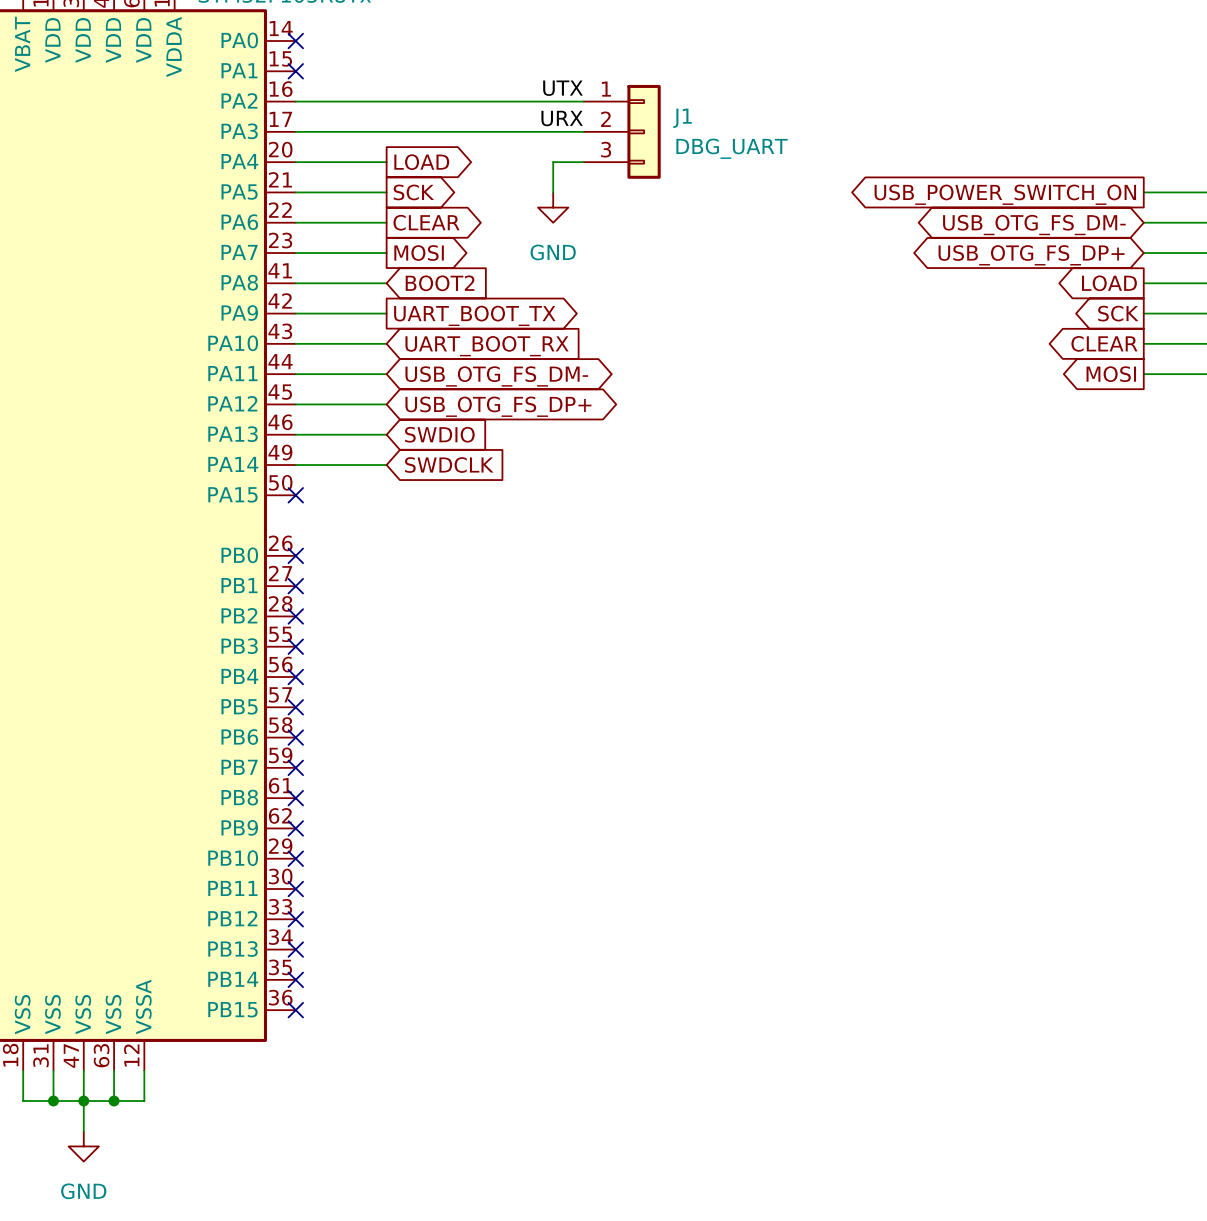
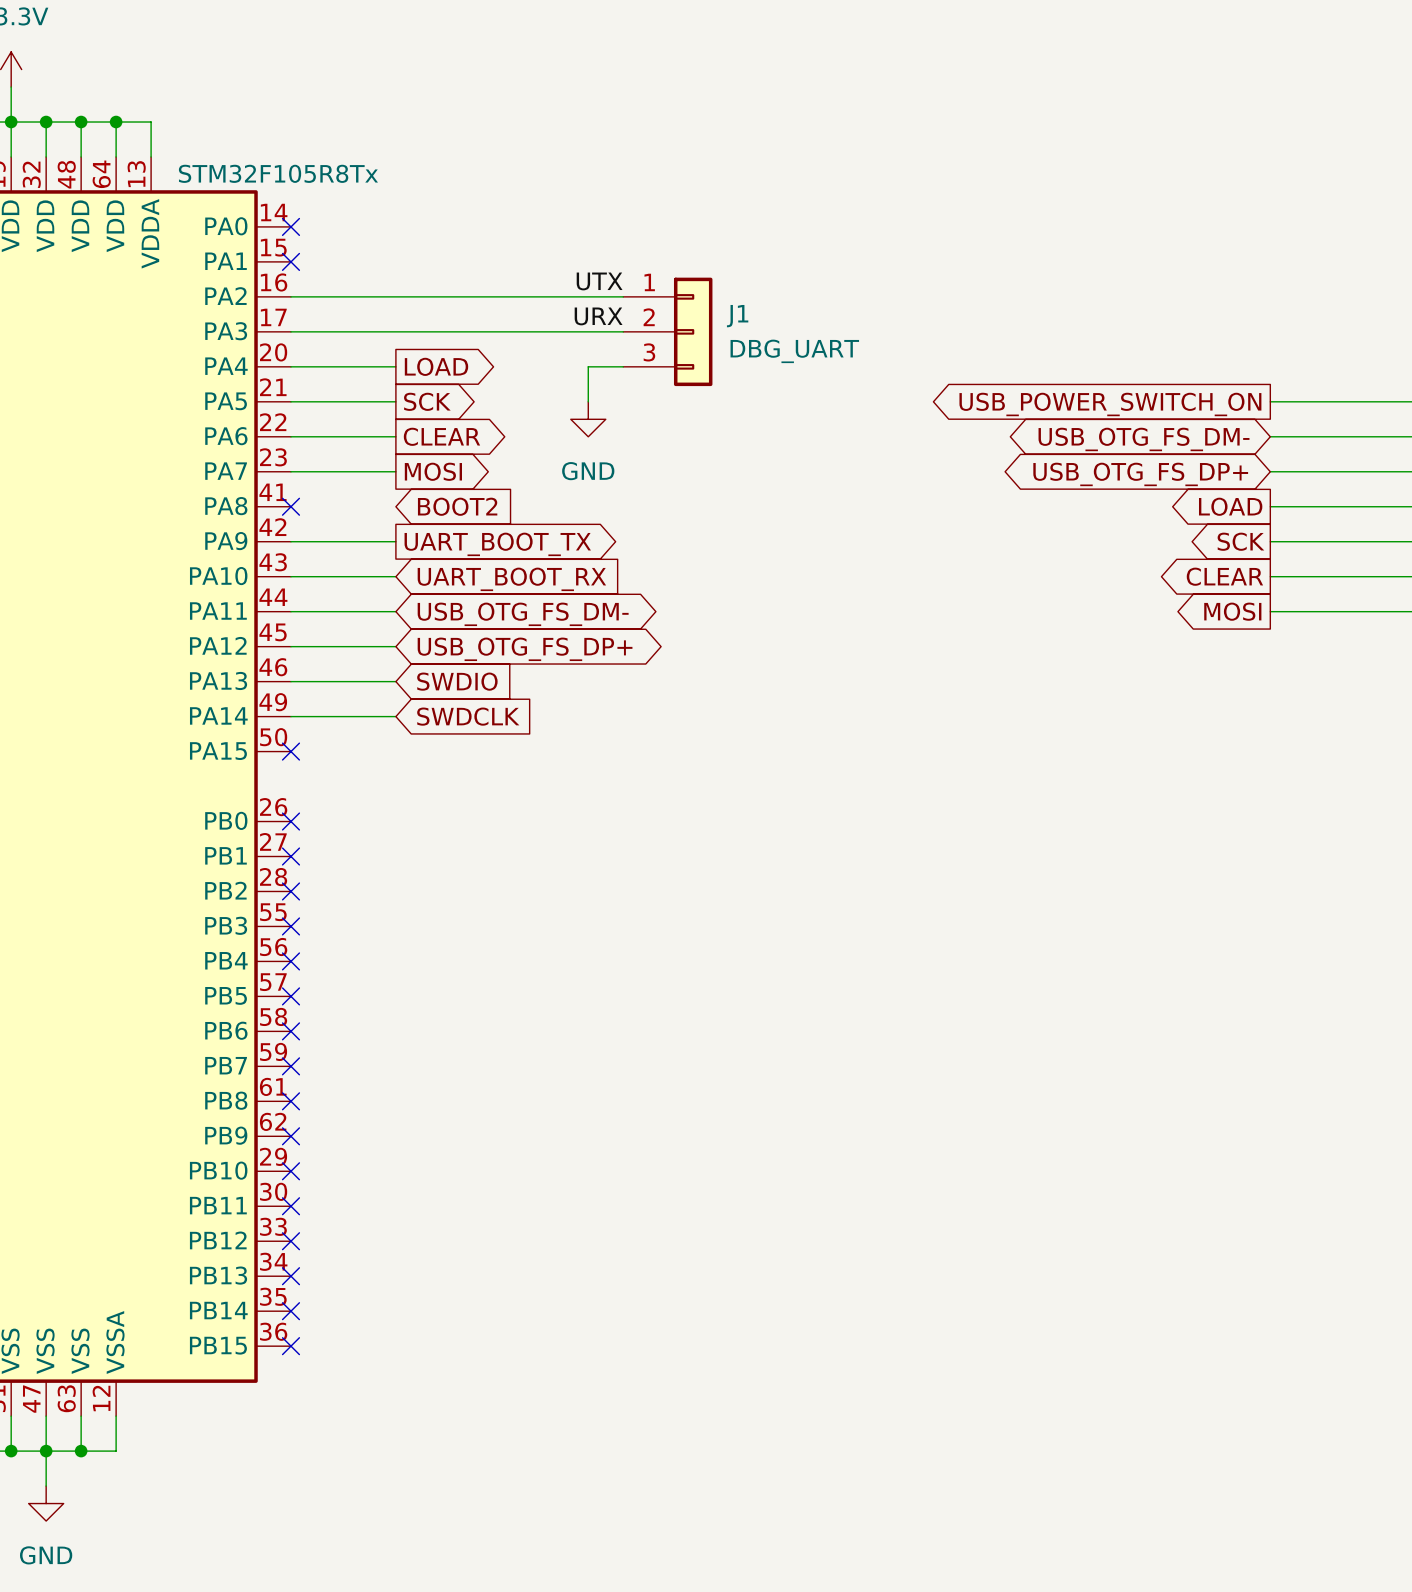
wire: (295, 283) (386, 283) -> none
no-connect mark: none -> (290, 506)

